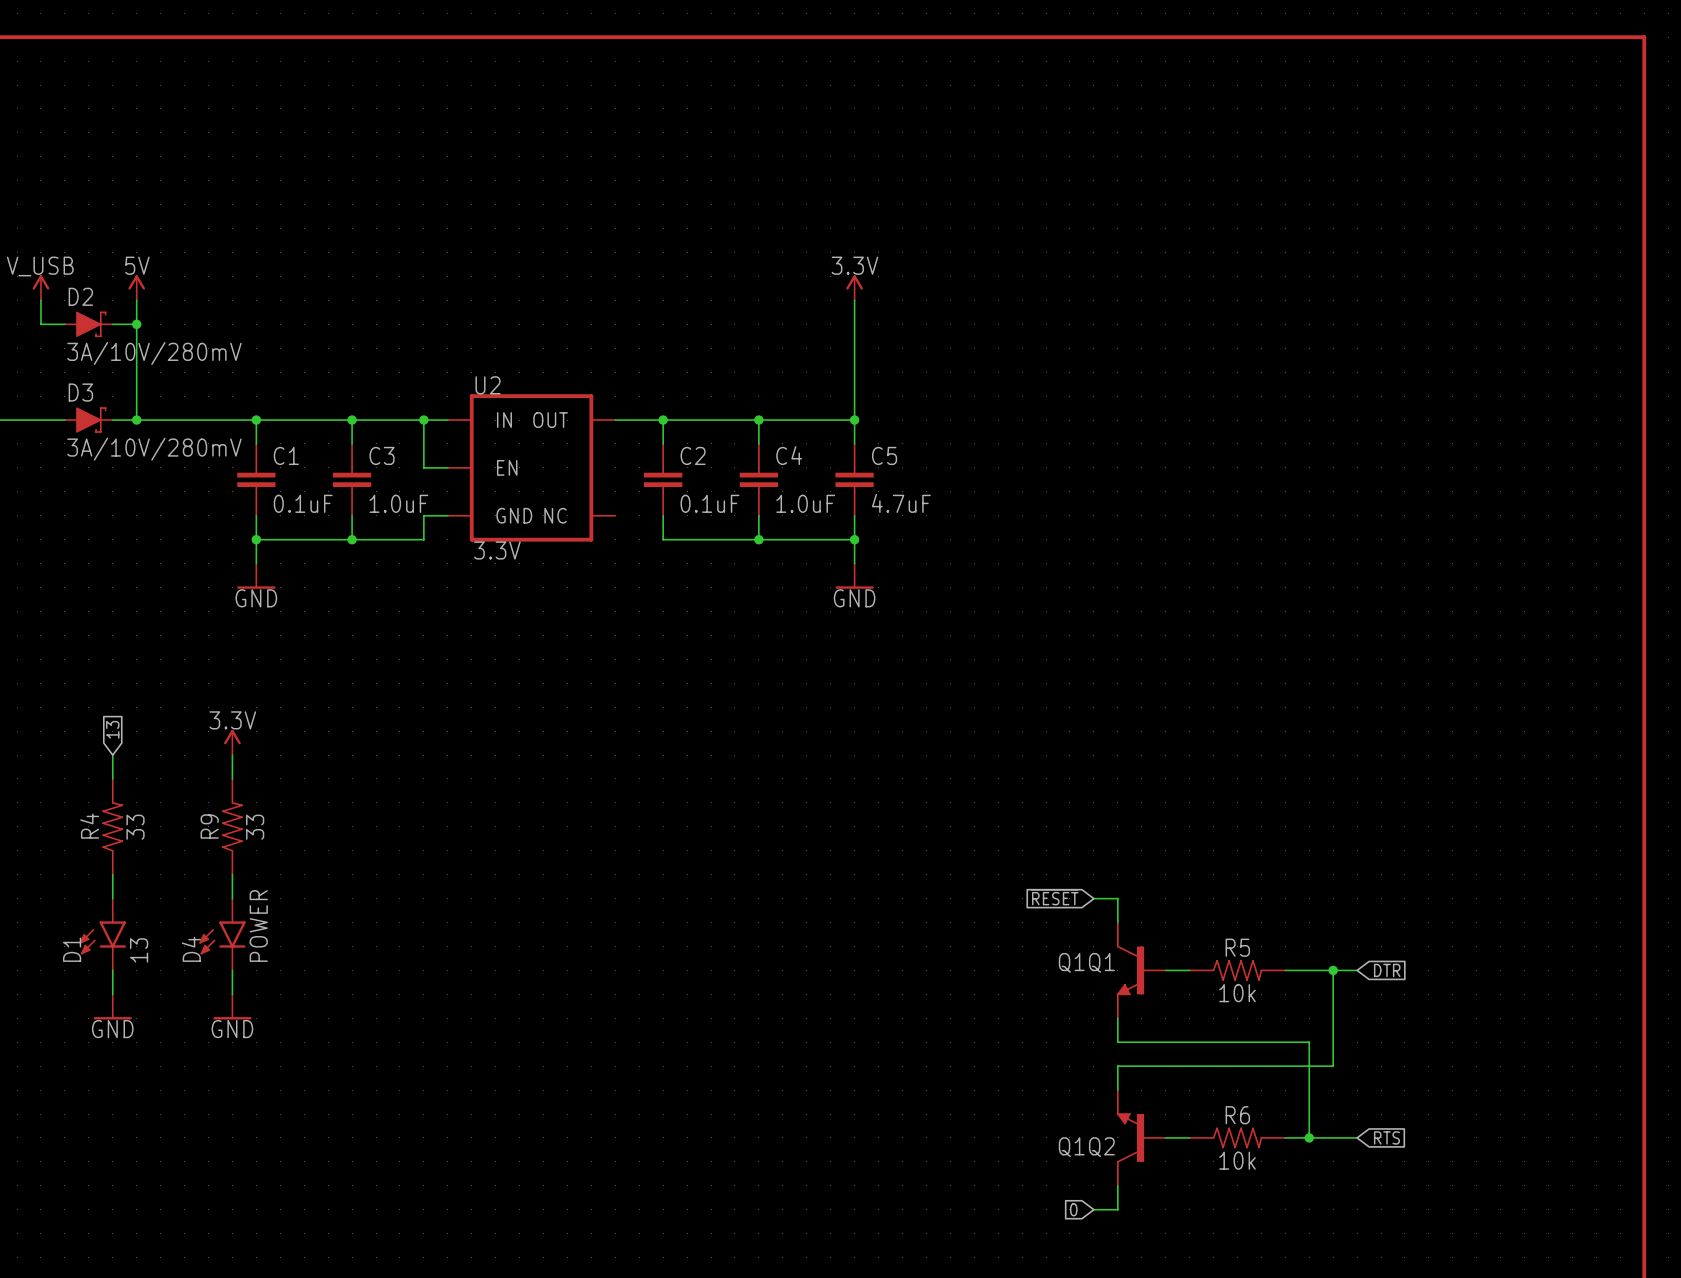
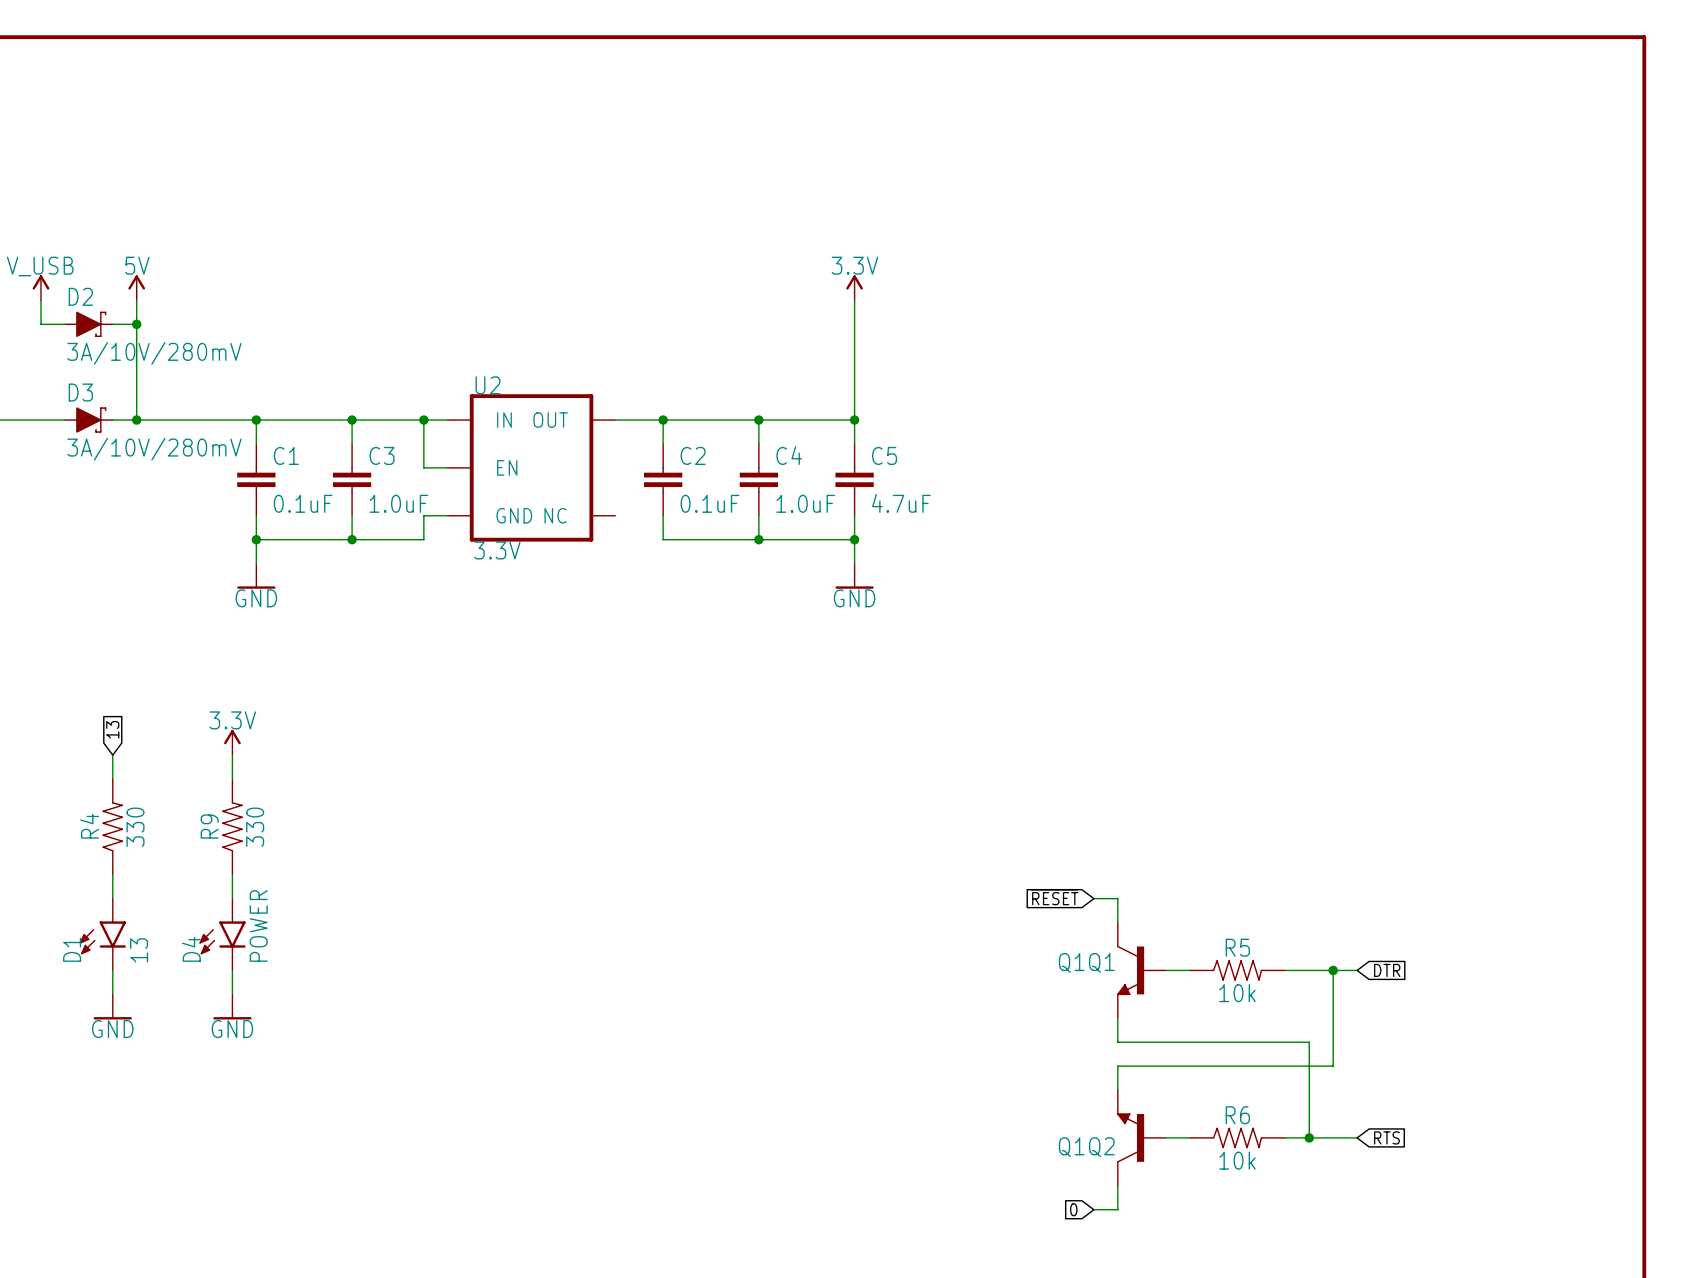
R4 value: 33 (135, 827) -> 330 (135, 827)
R9 value: 33 (255, 827) -> 330 (255, 827)

